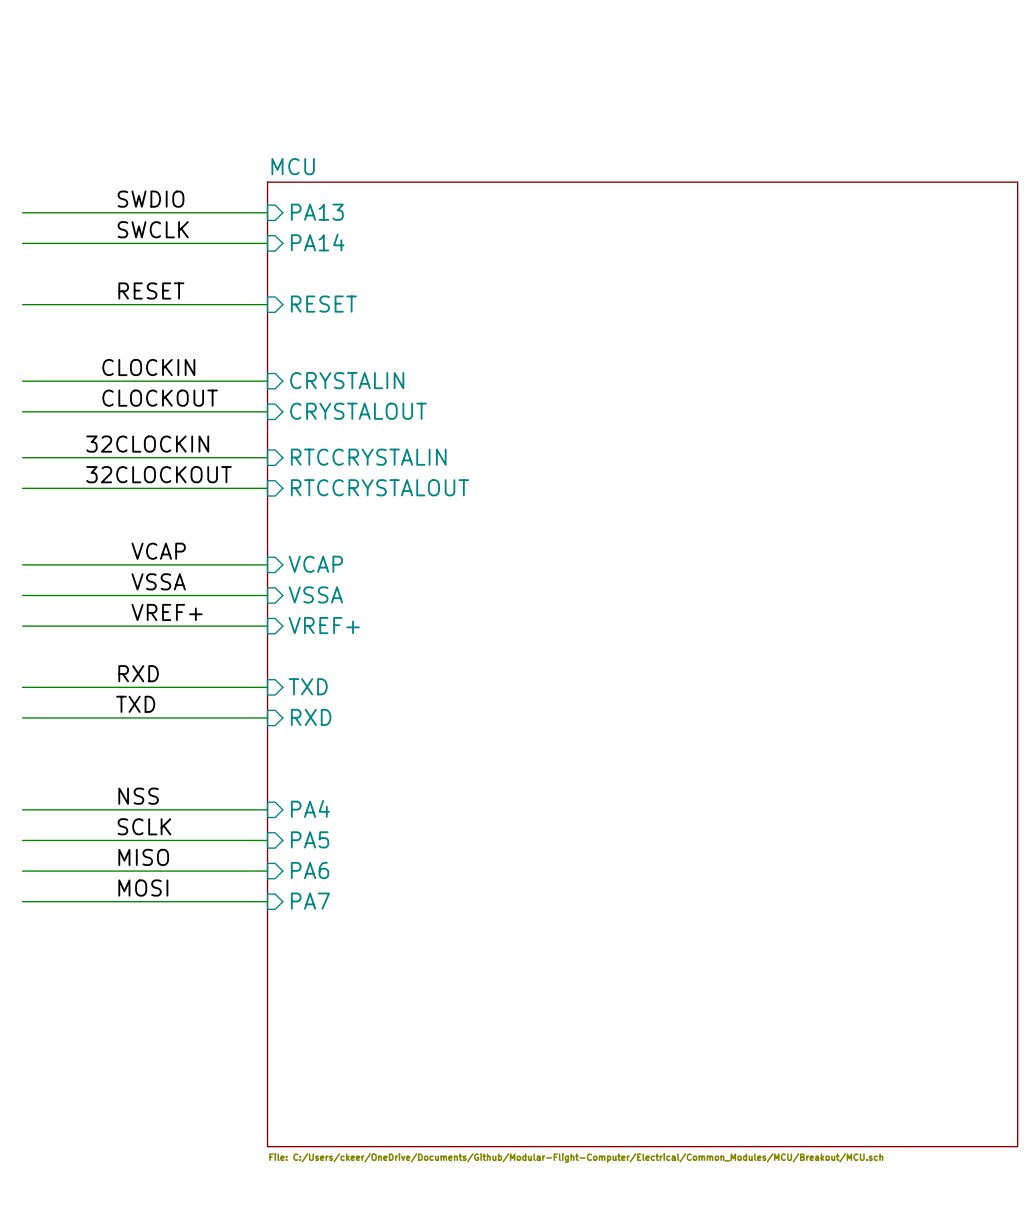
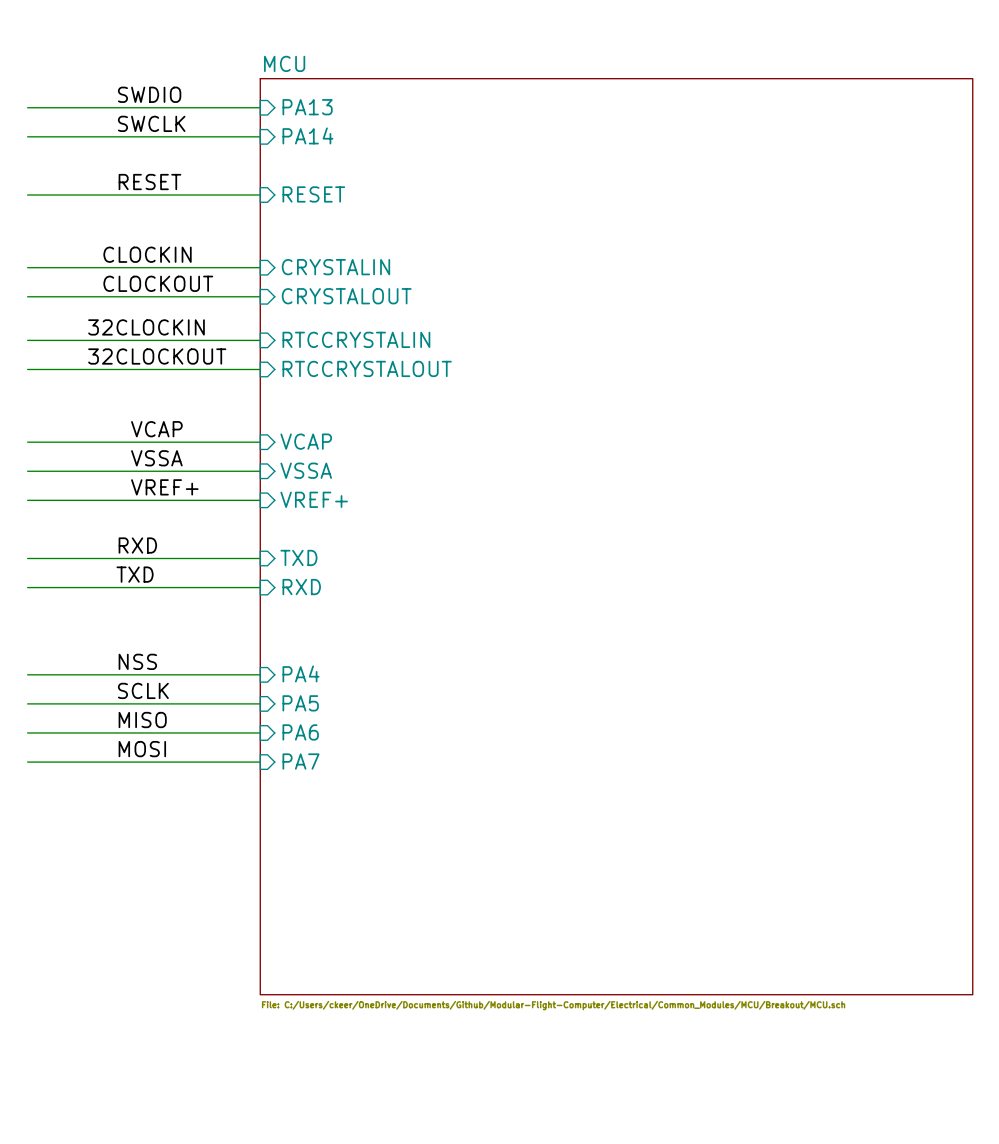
label position: SWDIO (151, 199) -> SWDIO (149, 94)
wire: (22, 212) (267, 212) -> (27, 107) (260, 107)
sheet pin position: PA13 (317, 212) -> PA13 (307, 107)
label position: SWCLK (153, 229) -> SWCLK (151, 123)
sheet pin position: PA14 (317, 242) -> PA14 (307, 135)
wire: (22, 243) (267, 243) -> (27, 136) (260, 136)
label position: RESET (151, 290) -> RESET (149, 182)
wire: (22, 304) (267, 304) -> (27, 194) (260, 194)
sheet pin position: RESET (323, 304) -> RESET (313, 194)
label position: CLOCKIN (148, 367) -> CLOCKIN (147, 254)
sheet pin position: CRYSTALIN (347, 380) -> CRYSTALIN (335, 267)
wire: (22, 381) (267, 381) -> (27, 267) (260, 267)
label position: CLOCKOUT (160, 398) -> CLOCKOUT (158, 283)
wire: (22, 411) (267, 411) -> (27, 296) (260, 296)
sheet pin position: CRYSTALOUT (358, 411) -> CRYSTALOUT (346, 296)
sheet pin: none -> VCAP (306, 441)
wire: none -> (27, 442) (260, 442)
label position: 32CLOCKIN (147, 444) -> 32CLOCKIN (146, 327)
wire: (22, 457) (267, 457) -> (27, 340) (260, 340)
sheet pin position: RTCCRYSTALIN (368, 457) -> RTCCRYSTALIN (356, 339)
sheet pin: none -> VSSA (306, 470)
wire: none -> (27, 471) (260, 471)
label position: 32CLOCKOUT (159, 474) -> 32CLOCKOUT (157, 356)
sheet pin position: RTCCRYSTALOUT (380, 487) -> RTCCRYSTALOUT (367, 368)
wire: (22, 488) (267, 488) -> (27, 369) (260, 369)
label: none -> RXD (137, 545)
label position: VCAP (158, 551) -> VCAP (156, 429)
sheet pin: VCAP (315, 564) -> TXD (298, 557)
label: none -> TXD (135, 574)
label position: VSSA (158, 581) -> VSSA (156, 458)
sheet pin: VSSA (315, 594) -> RXD (301, 587)
label position: VREF+ (167, 612) -> VREF+ (164, 487)
sheet pin position: VREF+ (324, 625) -> VREF+ (314, 499)
wire: (22, 626) (267, 626) -> (27, 500) (260, 500)
sheet MCU position: (642, 664) -> (616, 536)
label: RXD (138, 673) -> NSS (137, 661)
sheet pin: TXD (308, 686) -> PA4 (301, 673)
label: TXD (135, 704) -> SCLK (143, 690)
sheet pin: RXD (311, 717) -> PA5 (300, 703)
label: NSS (138, 796) -> none
sheet pin: PA4 (310, 808) -> none
wire: (22, 809) (267, 809) -> none
label: SCLK (144, 826) -> none
sheet pin: PA5 (310, 839) -> none
wire: (22, 840) (267, 840) -> none
label position: MISO (143, 857) -> MISO (142, 720)
sheet pin position: PA6 (310, 870) -> PA6 (300, 732)
wire: (22, 871) (267, 871) -> (27, 732) (260, 732)
label position: MOSI (143, 888) -> MOSI (142, 749)
wire: (22, 901) (267, 901) -> (27, 762) (260, 762)
sheet pin position: PA7 (310, 901) -> PA7 (301, 761)

